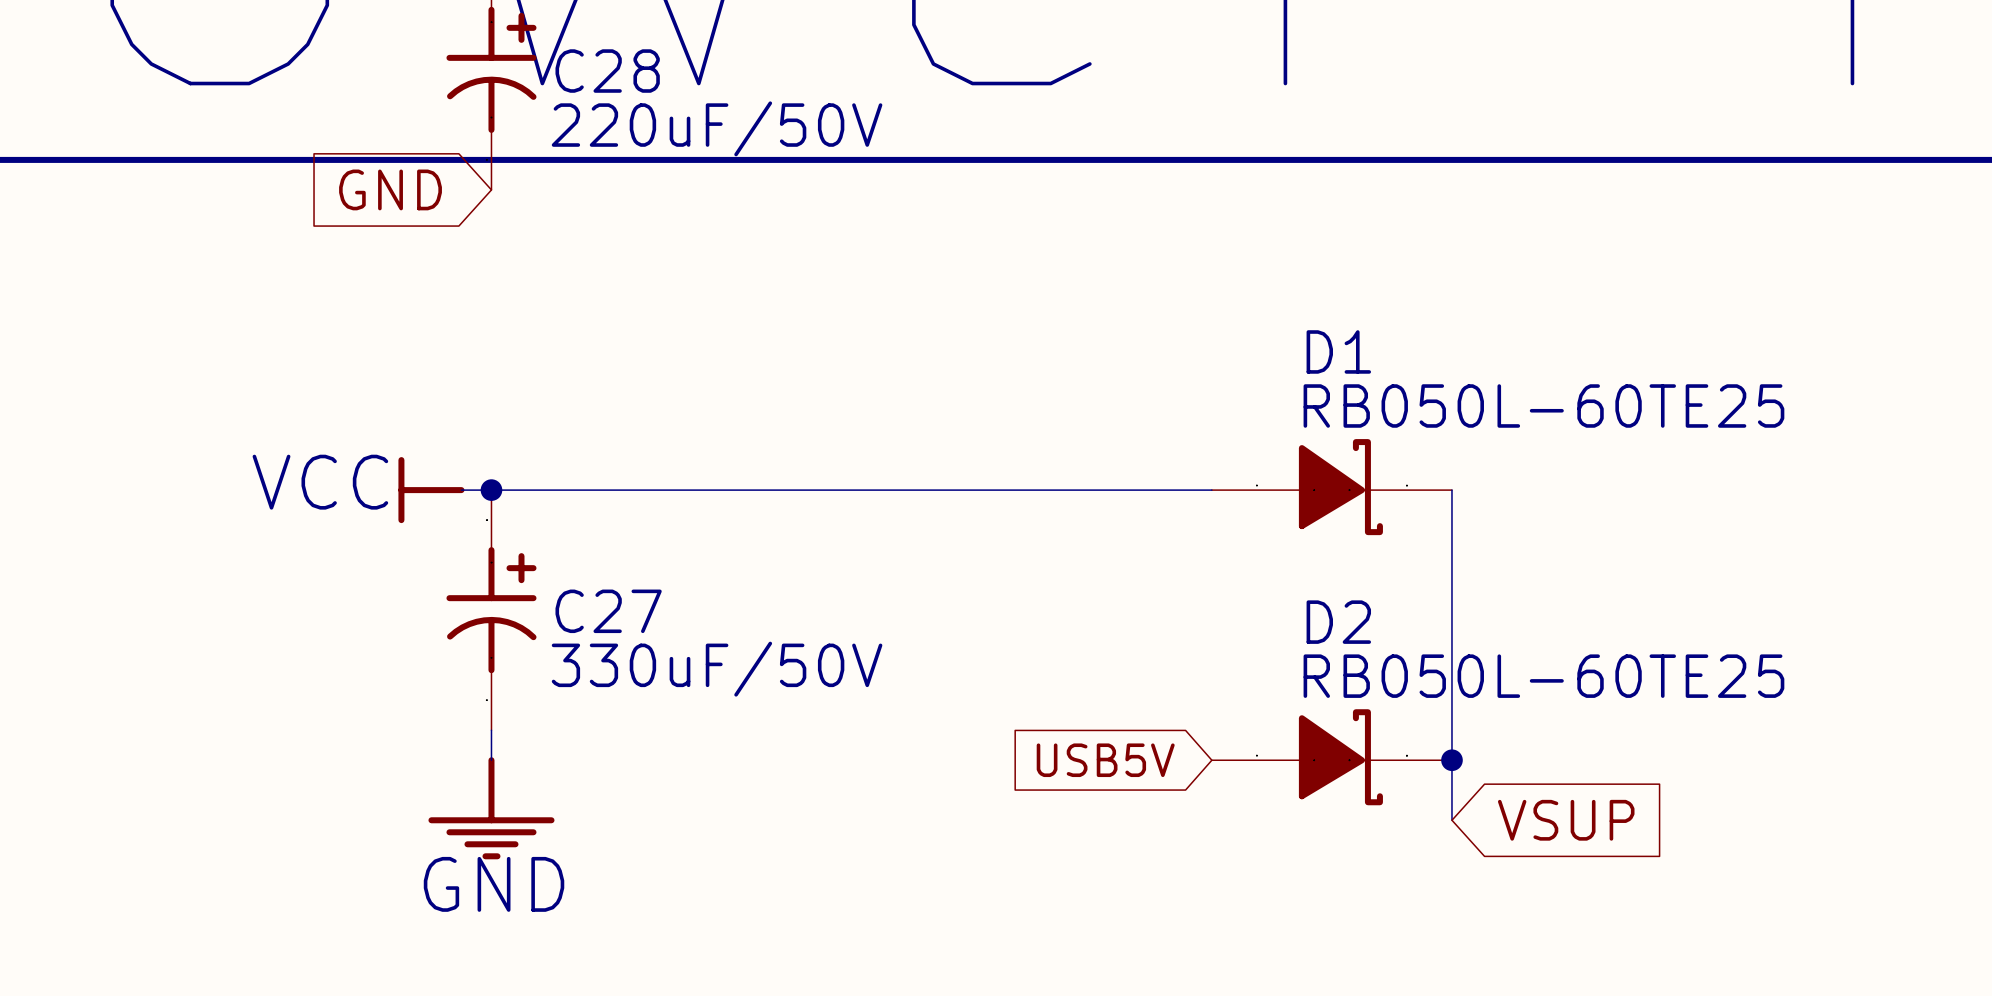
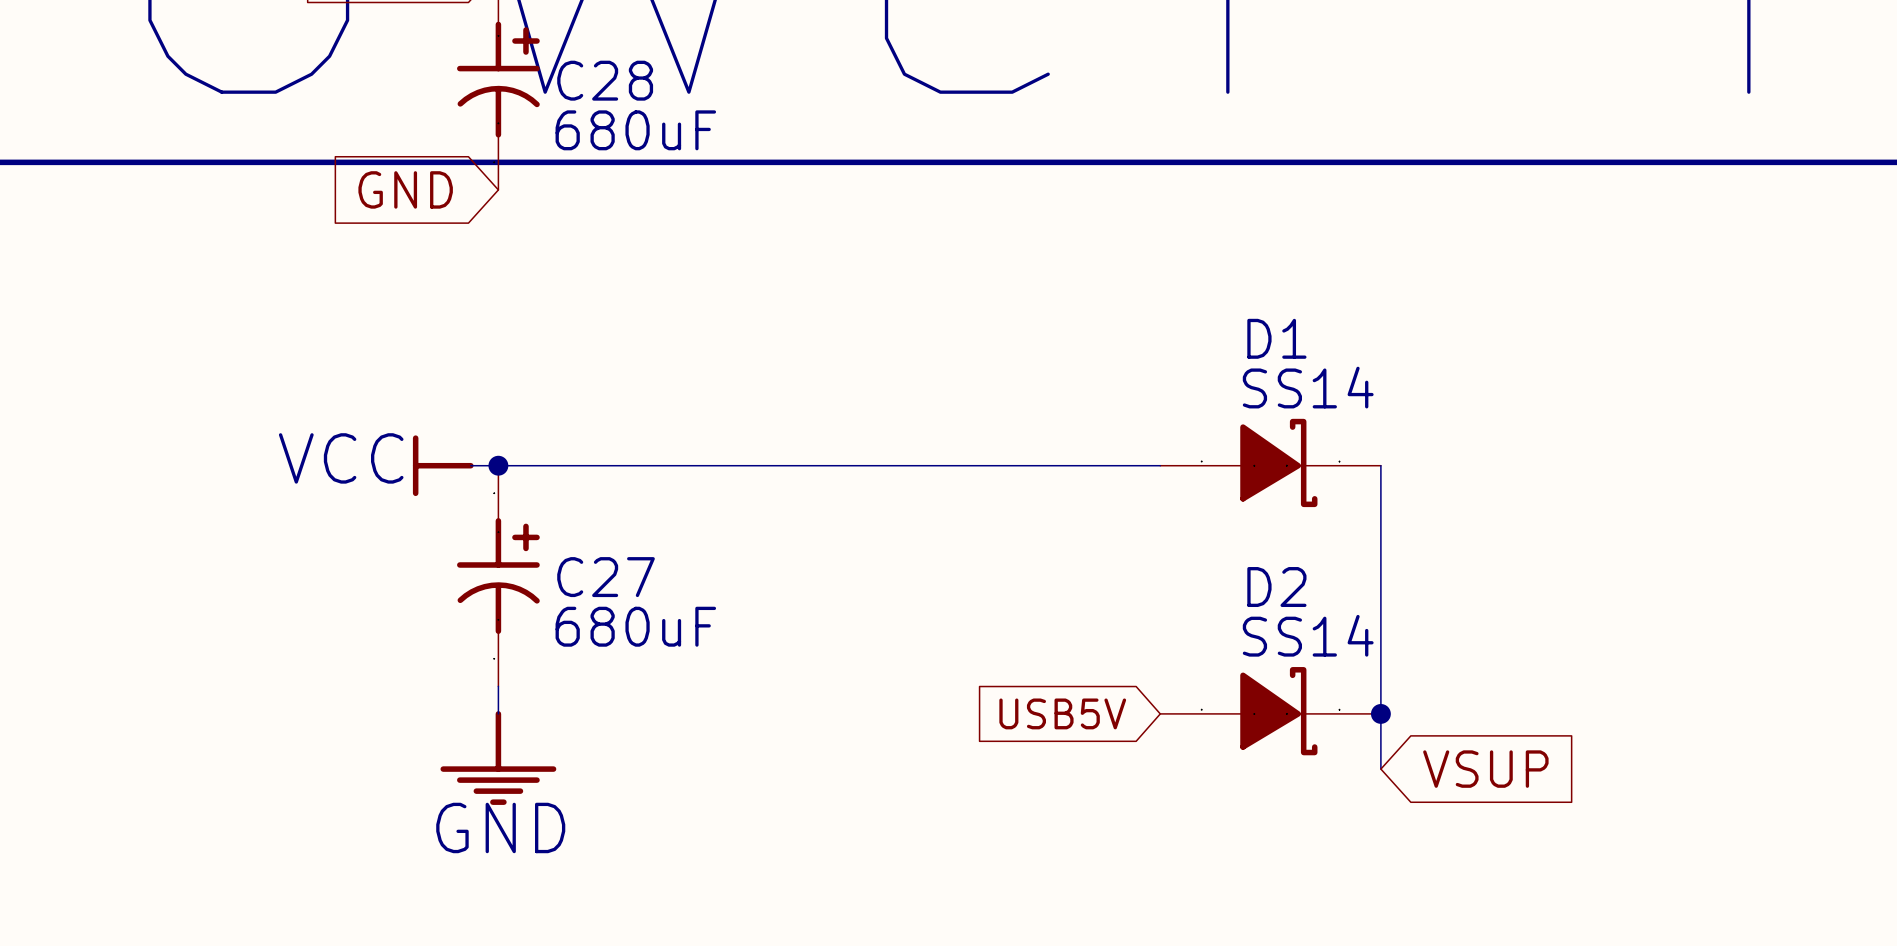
C28 value: 220uF/50V (717, 128) -> 680uF (635, 130)
D1 value: RB050L-60TE25 (1543, 406) -> SS14 (1308, 387)
C27 value: 330uF/50V (717, 669) -> 680uF (635, 626)
D2 value: RB050L-60TE25 (1543, 676) -> SS14 (1308, 635)

